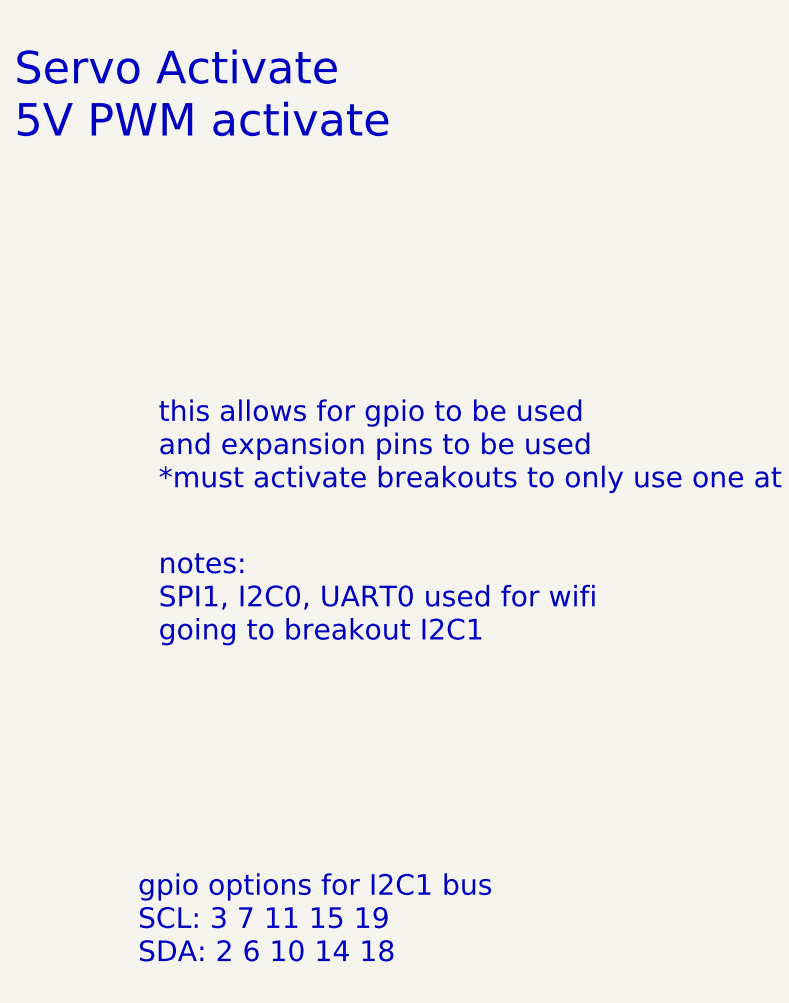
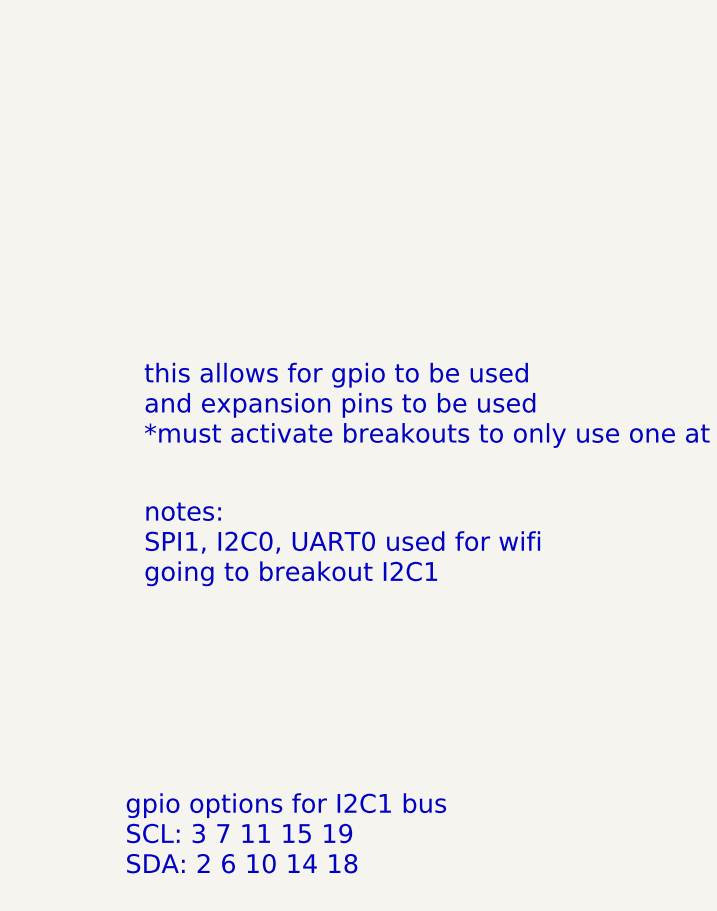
text: Servo Activate (177, 66) -> none
text: 5V PWM activate (203, 118) -> none

